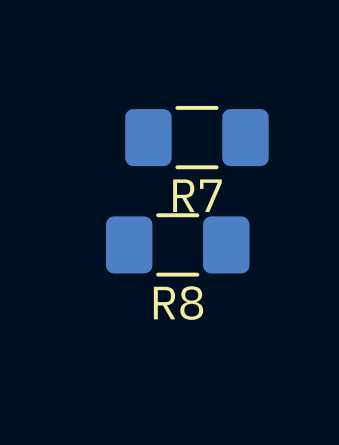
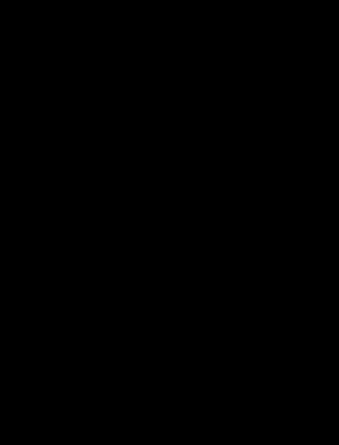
R7: (196, 137) -> none
R8: (177, 244) -> none

